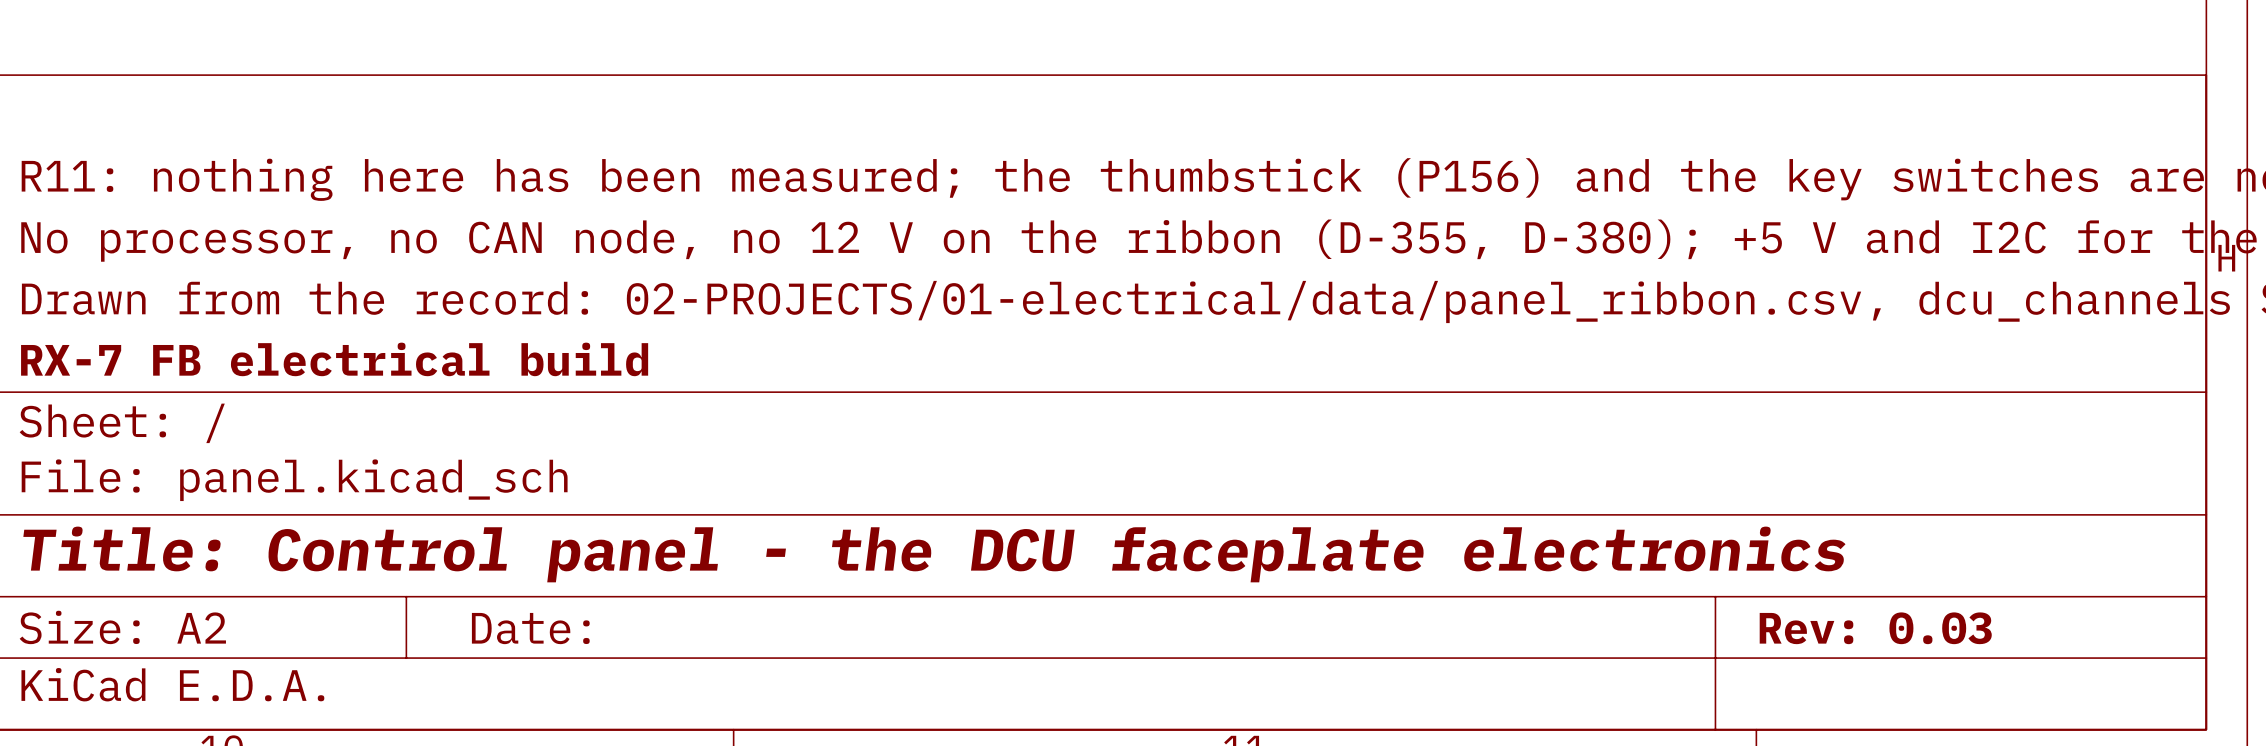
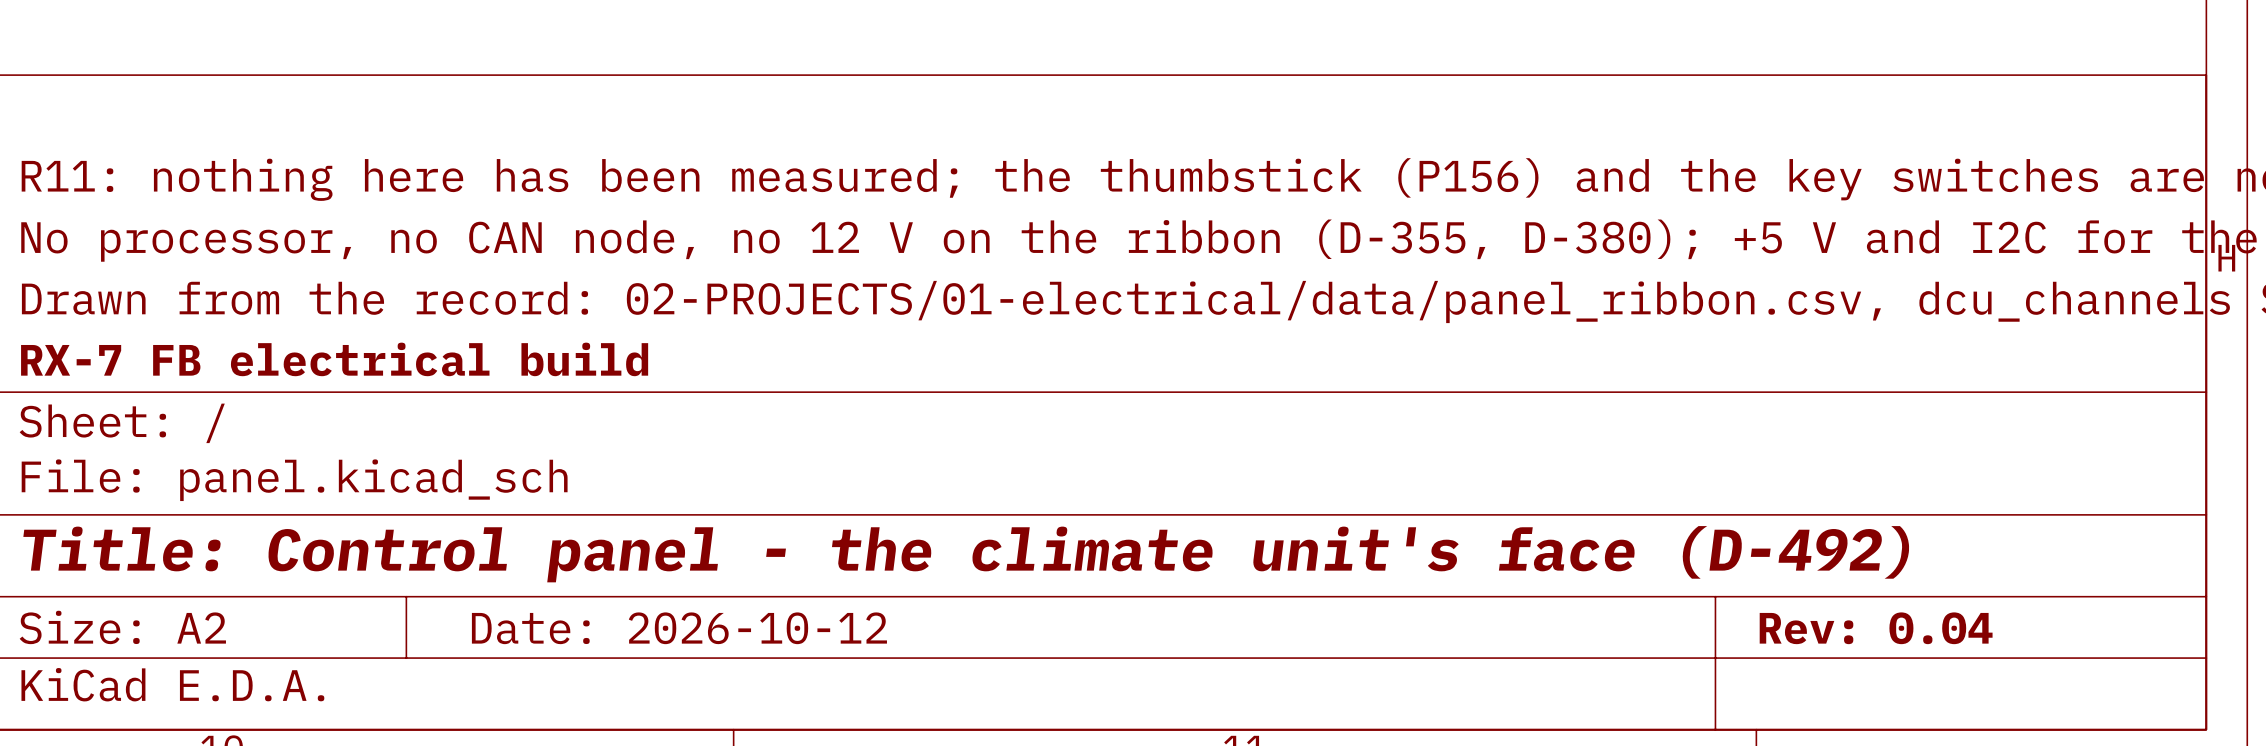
title block: Title: Control panel - the DCU faceplate electronics (934, 554) -> Title: Control panel - the climate unit's face (D-492) (966, 554)
title block: Date: (530, 628) -> Date: 2026-10-12 (679, 628)
title block: Rev: 0.03 (1875, 628) -> Rev: 0.04 (1876, 628)

